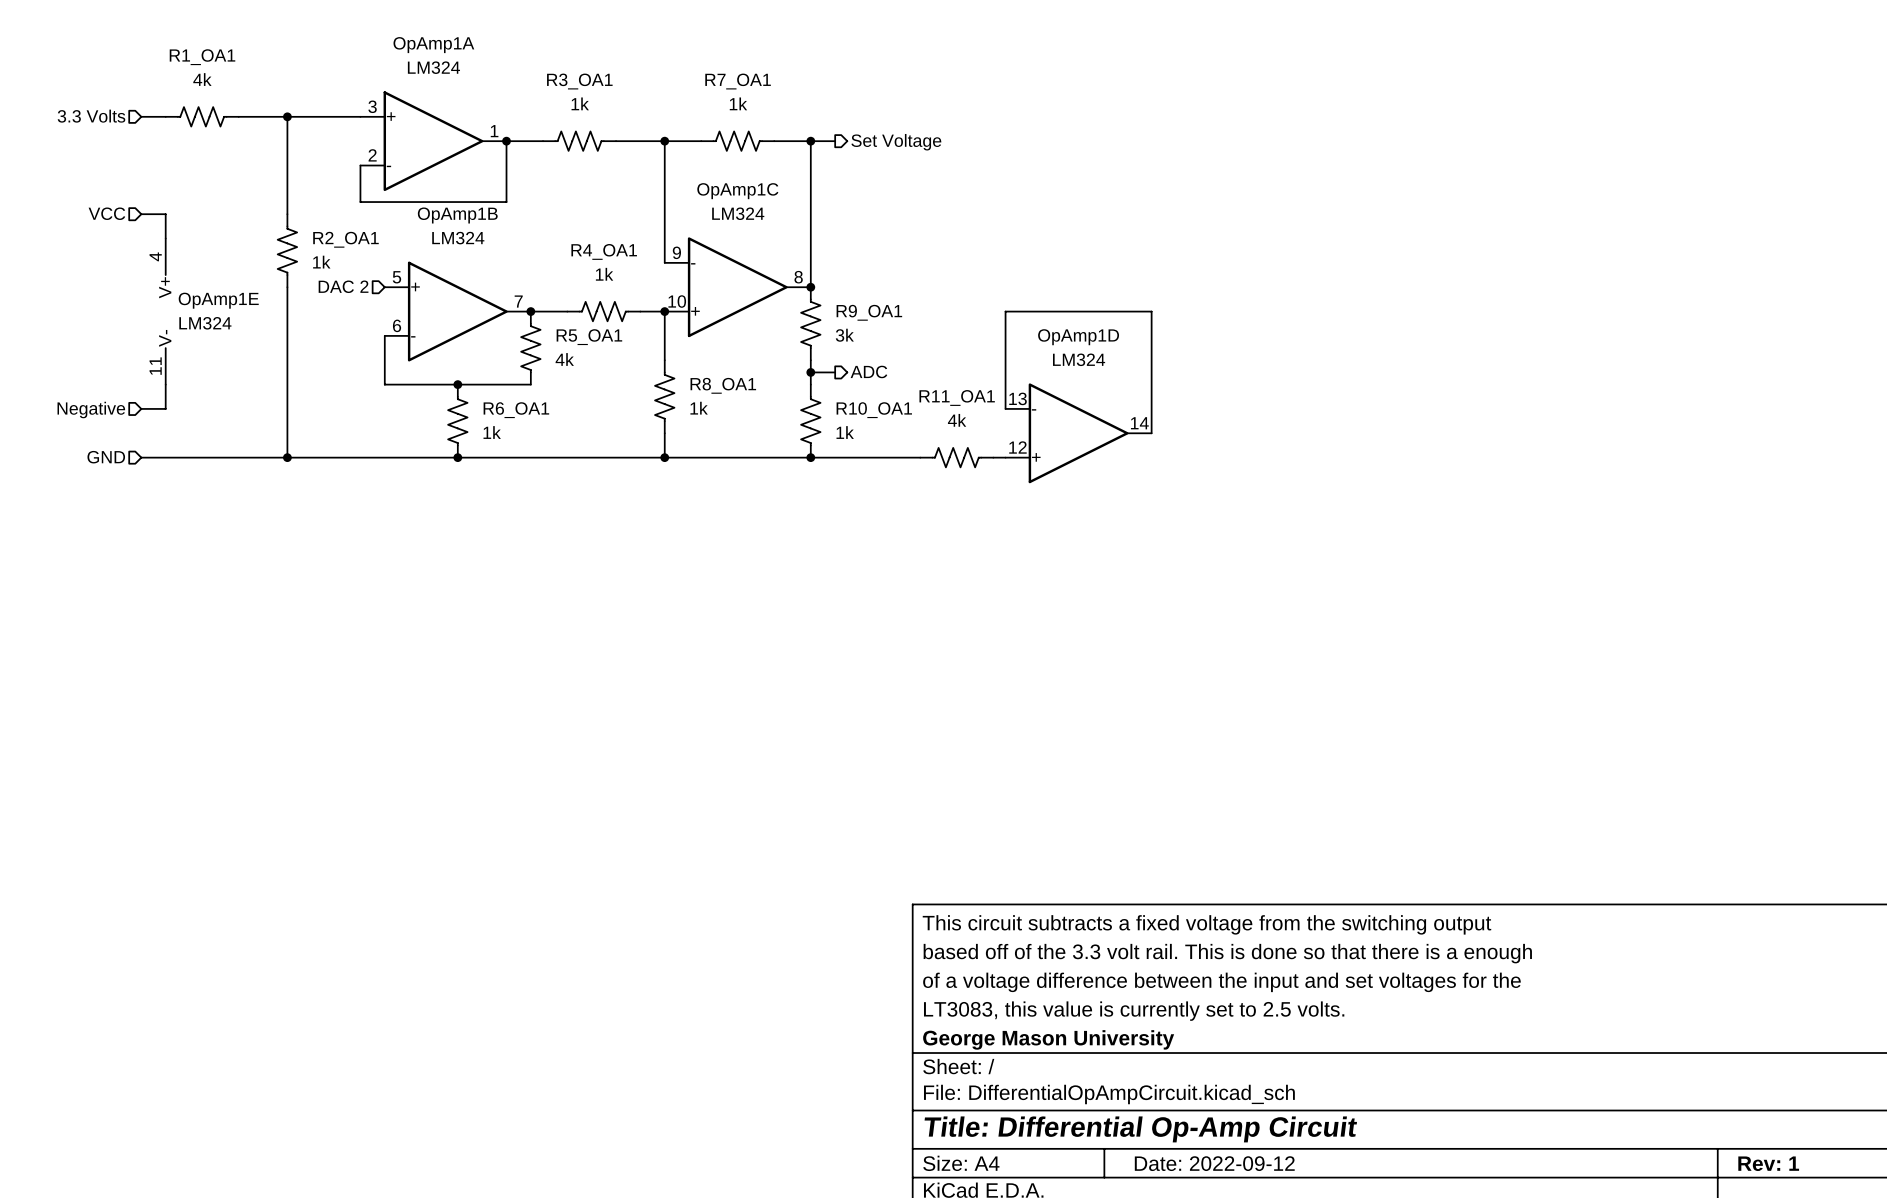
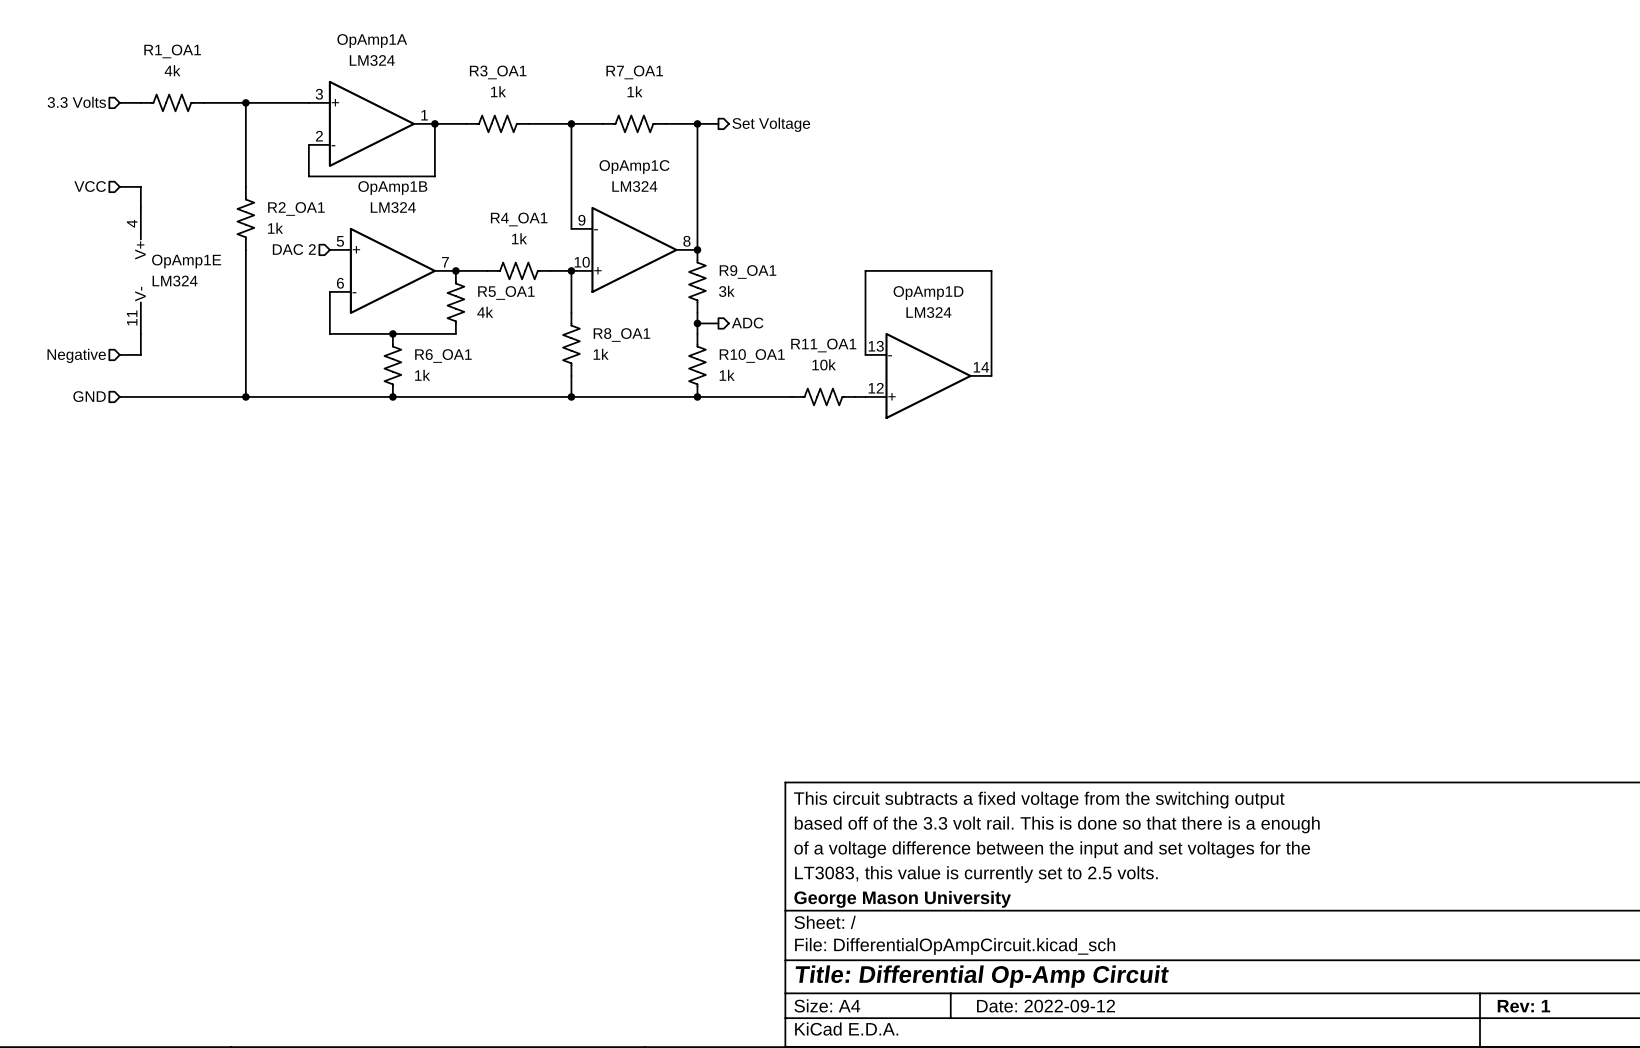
R11_OA1 value: 4k (957, 420) -> 10k (824, 364)

